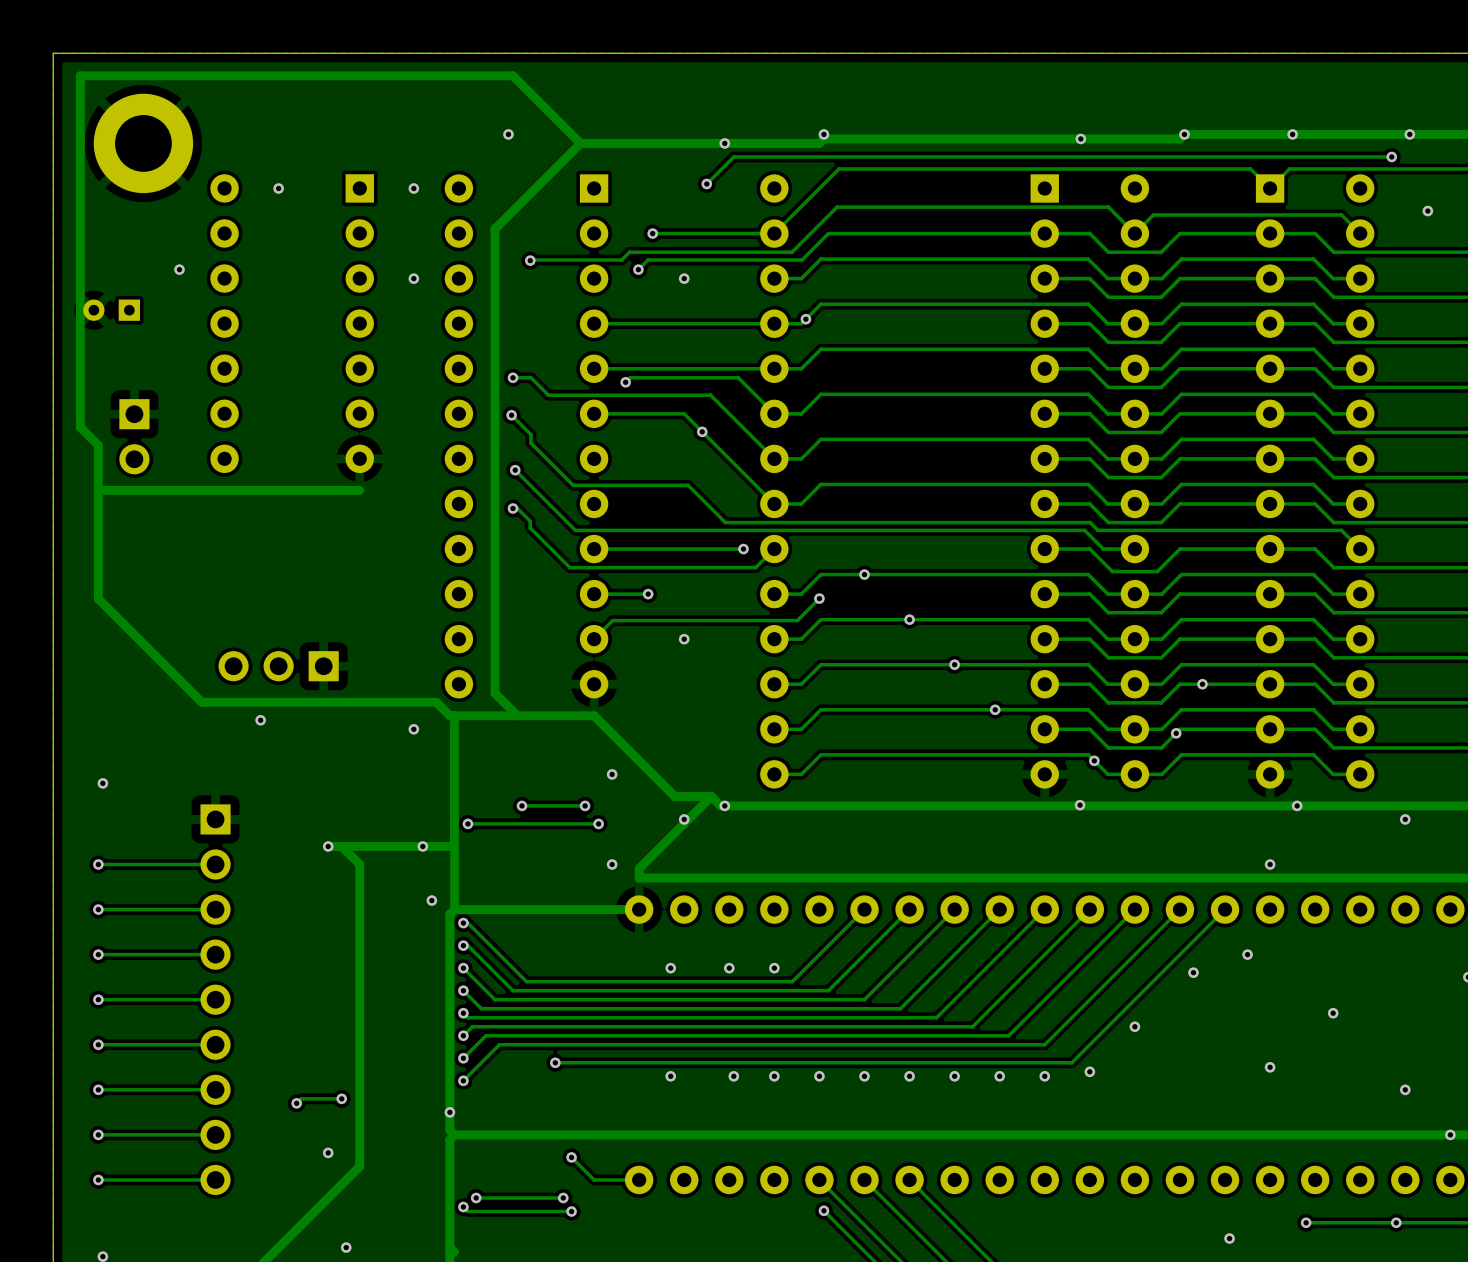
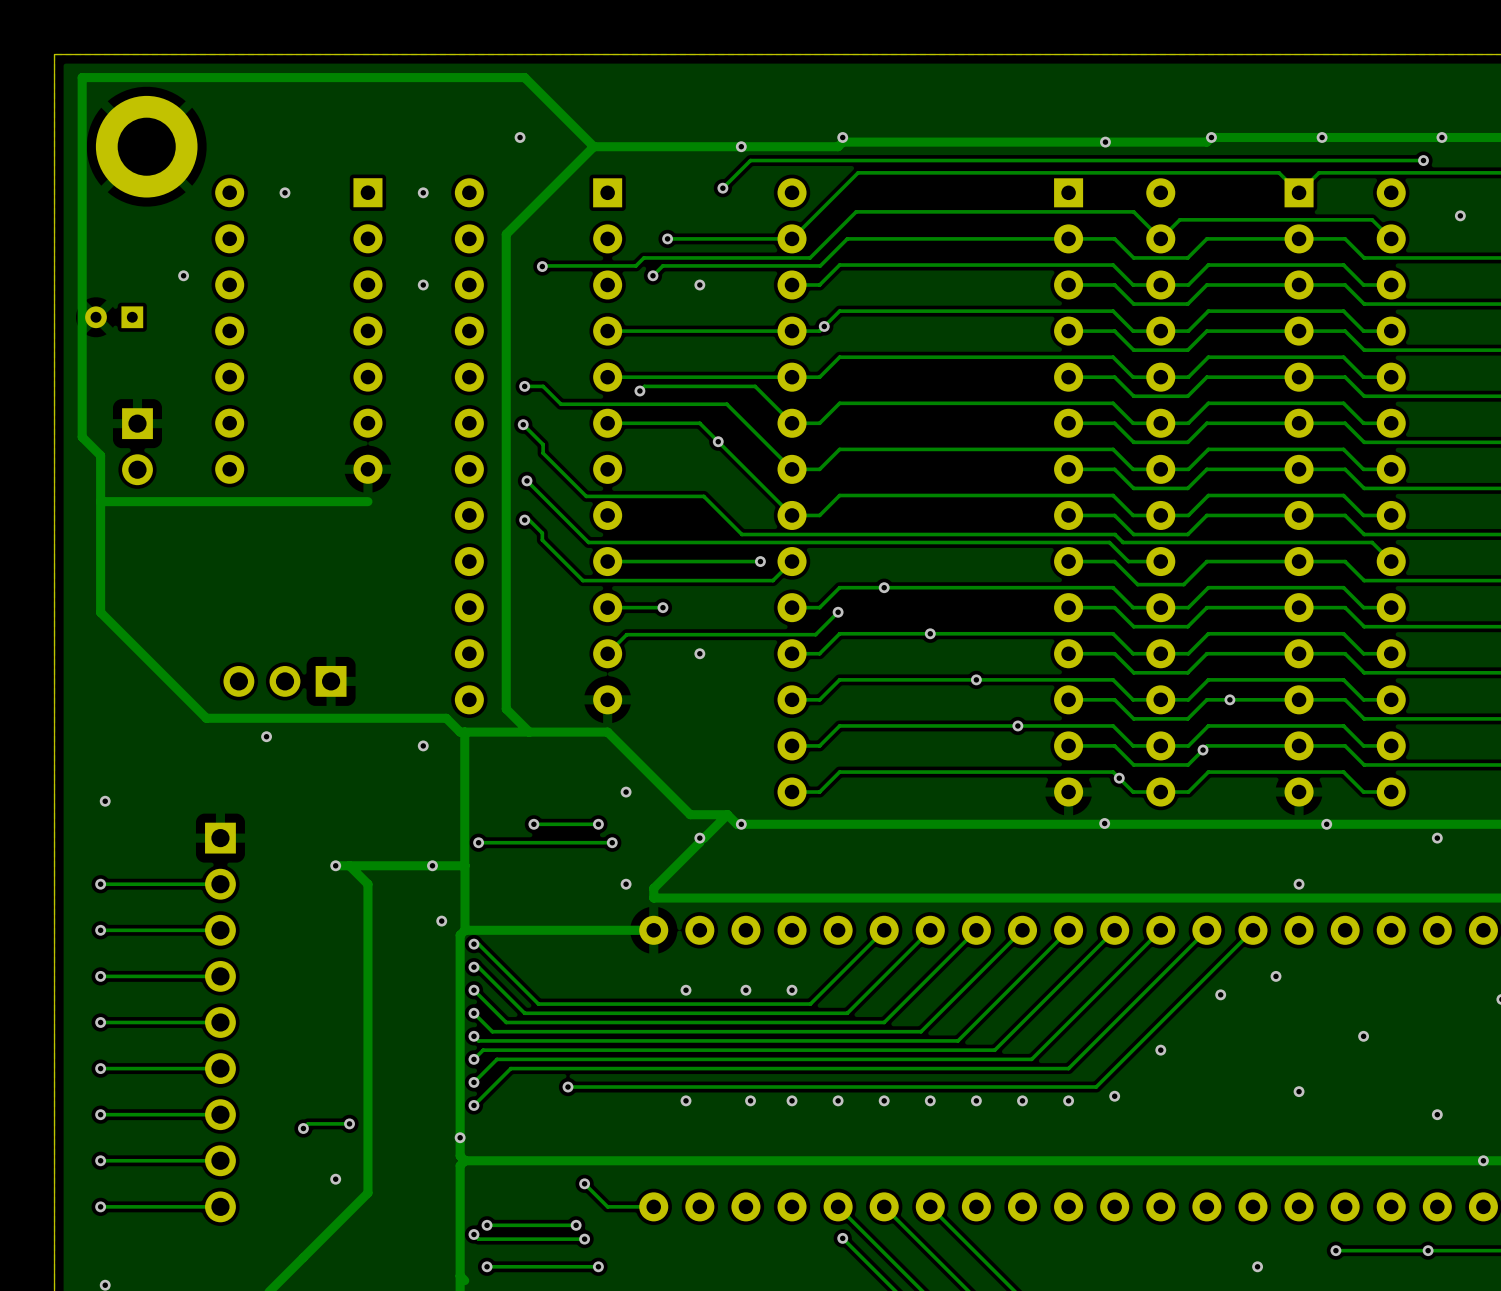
via: none -> (487, 1266)
track: none -> (598, 1266) (487, 1266)
via: none -> (598, 1266)
via: (346, 1247) -> none

